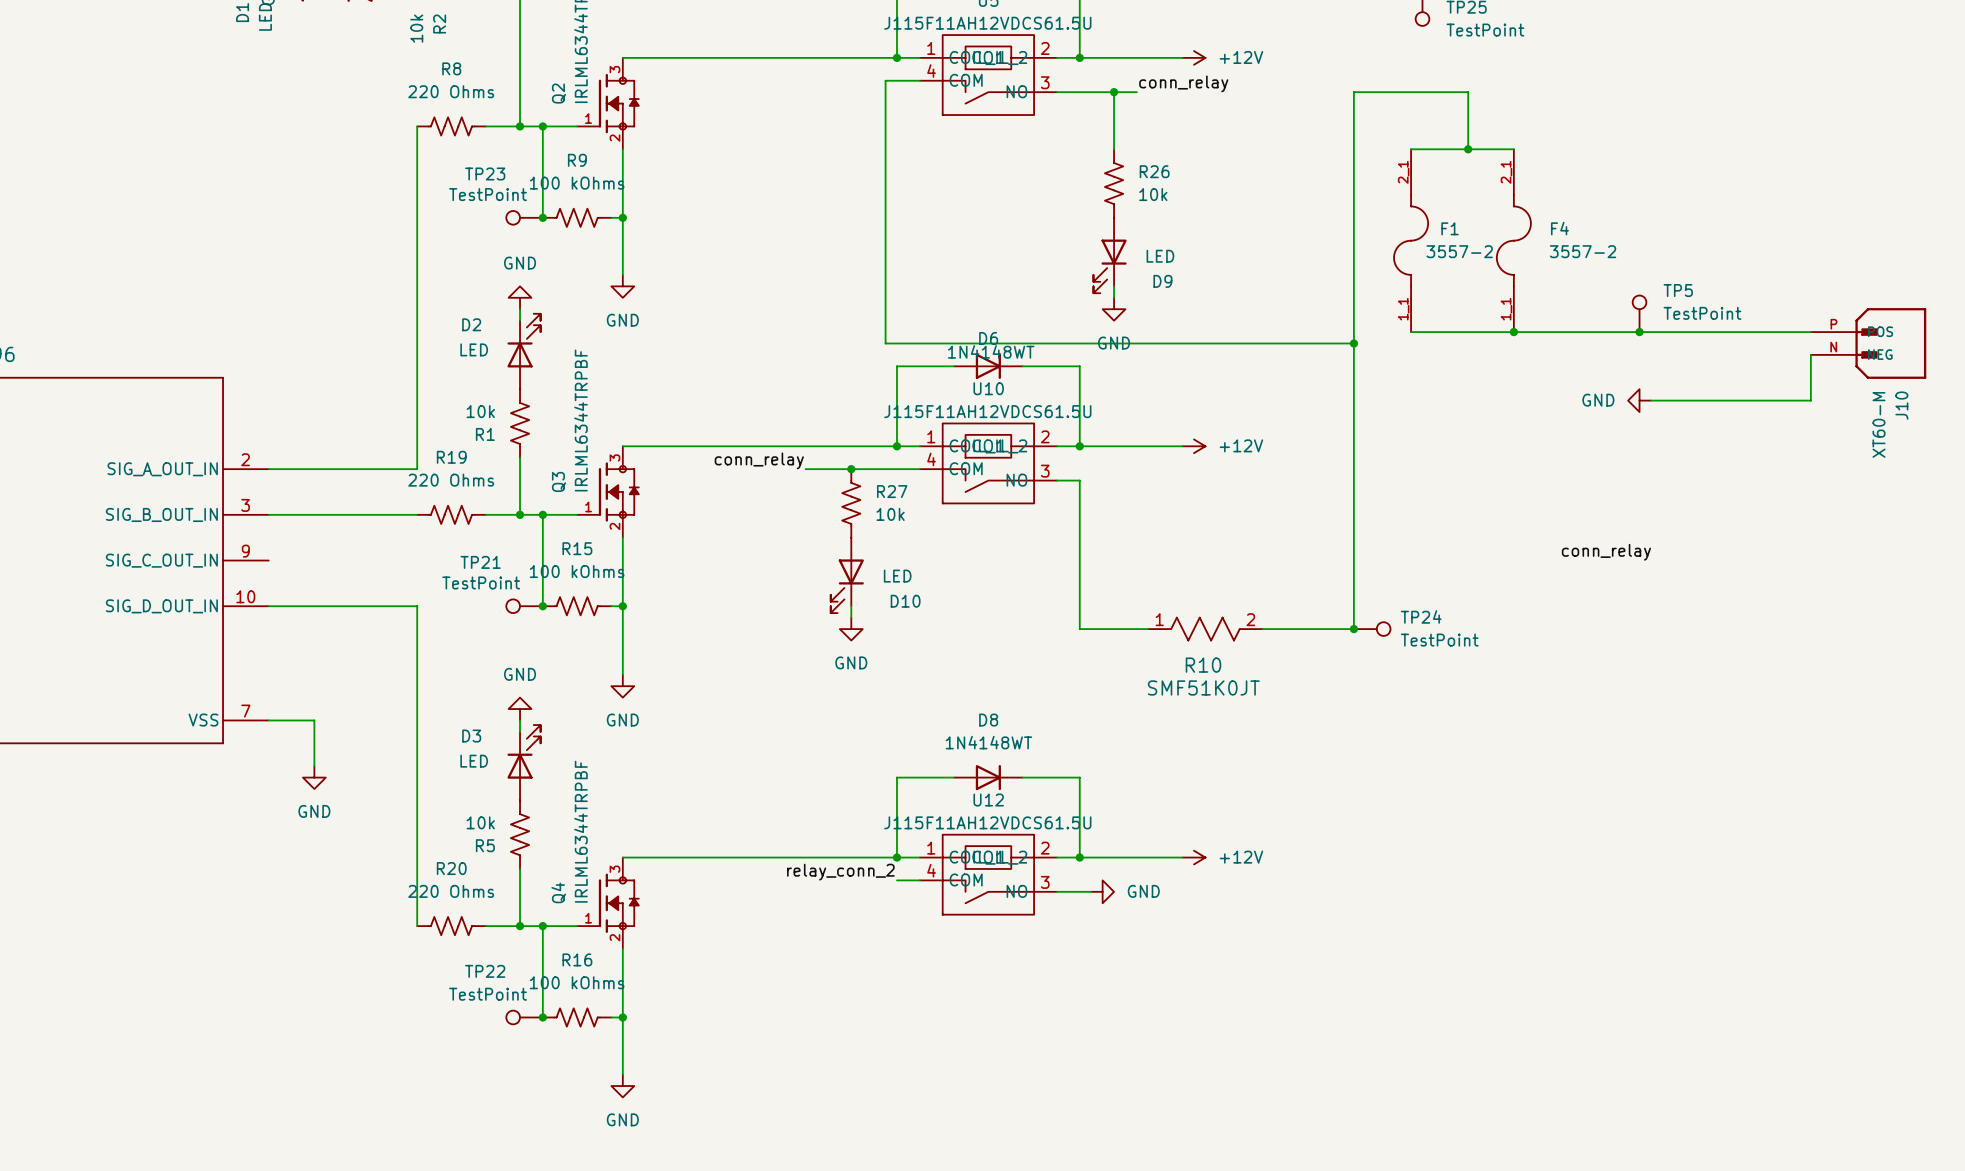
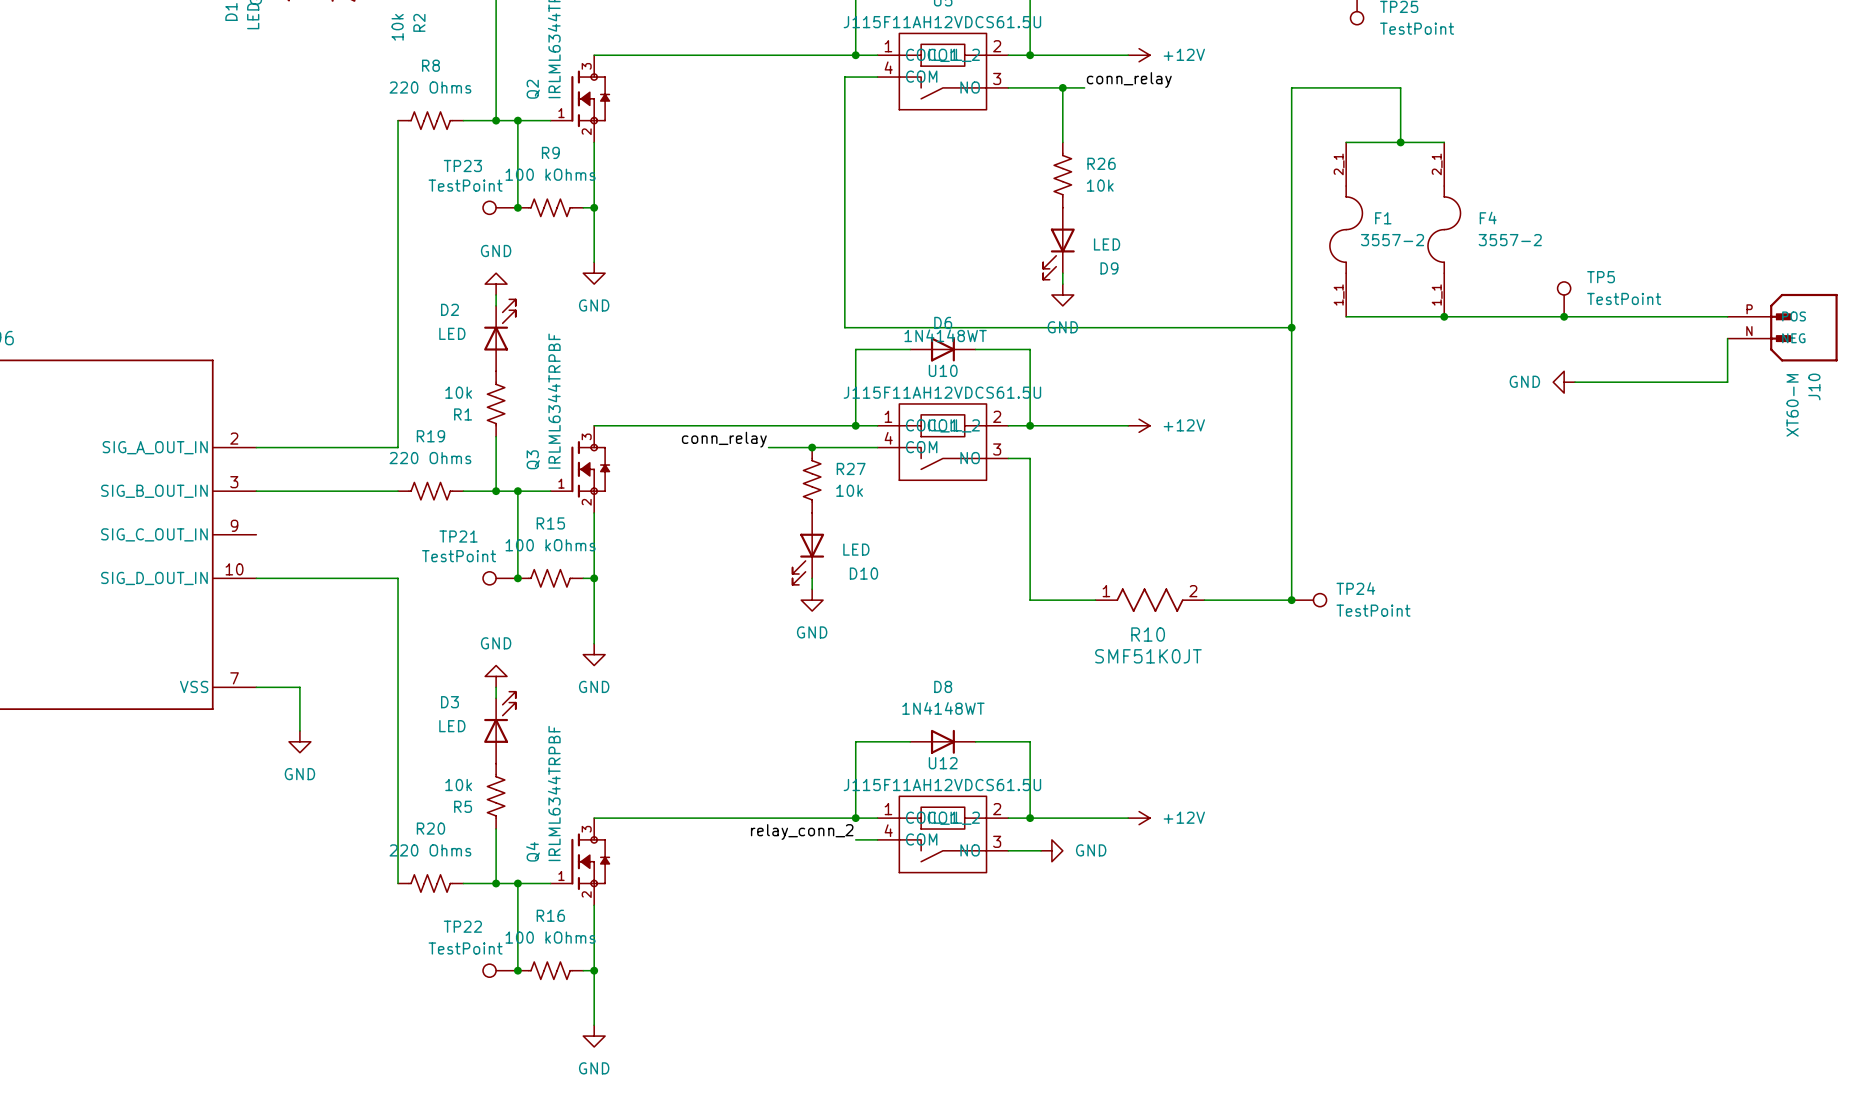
label: conn_relay (1606, 552) -> none

